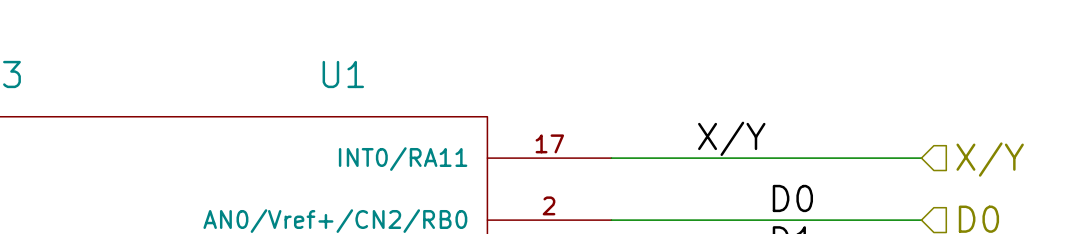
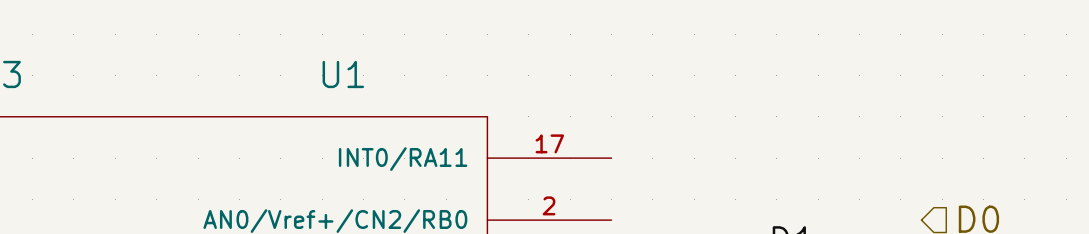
label: X/Y (731, 138) -> none
wire: (611, 158) (921, 158) -> none
hierarchical label: X/Y (990, 159) -> none
label: D0 (792, 198) -> none
wire: (611, 220) (921, 220) -> none

